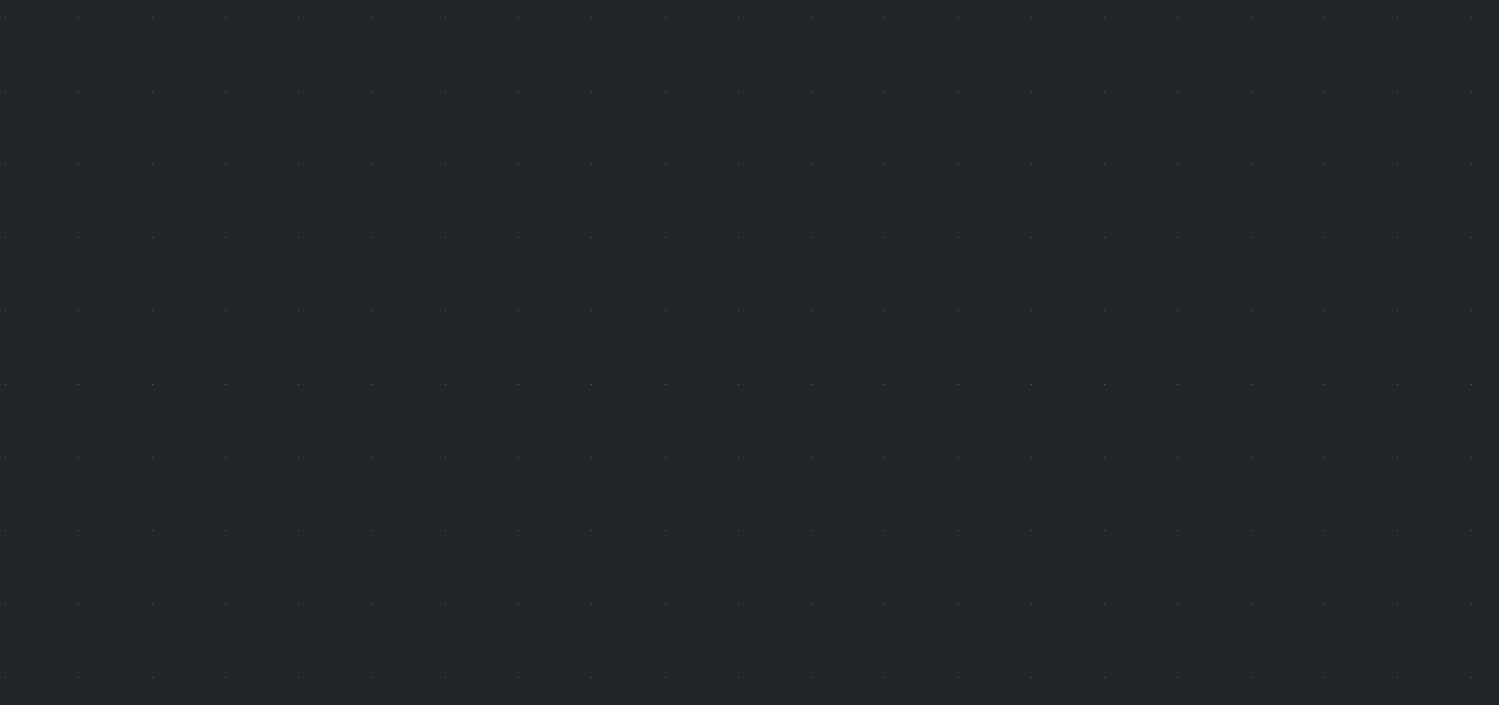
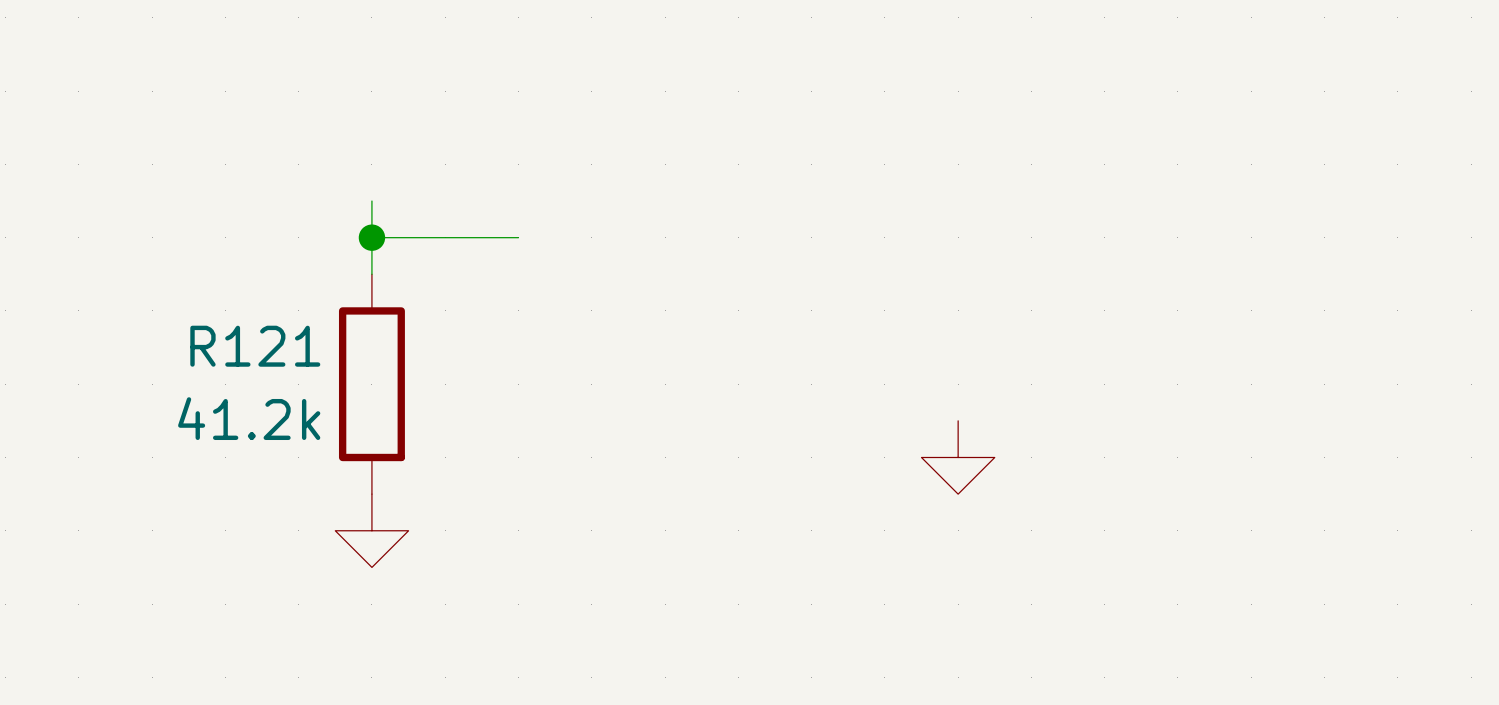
wire: none -> (371, 201) (371, 274)
wire: none -> (371, 237) (518, 237)
junction: none -> (371, 237)
R121: none -> 41.2k (371, 384)
power symbol: none -> (958, 457)
power symbol: none -> (371, 530)

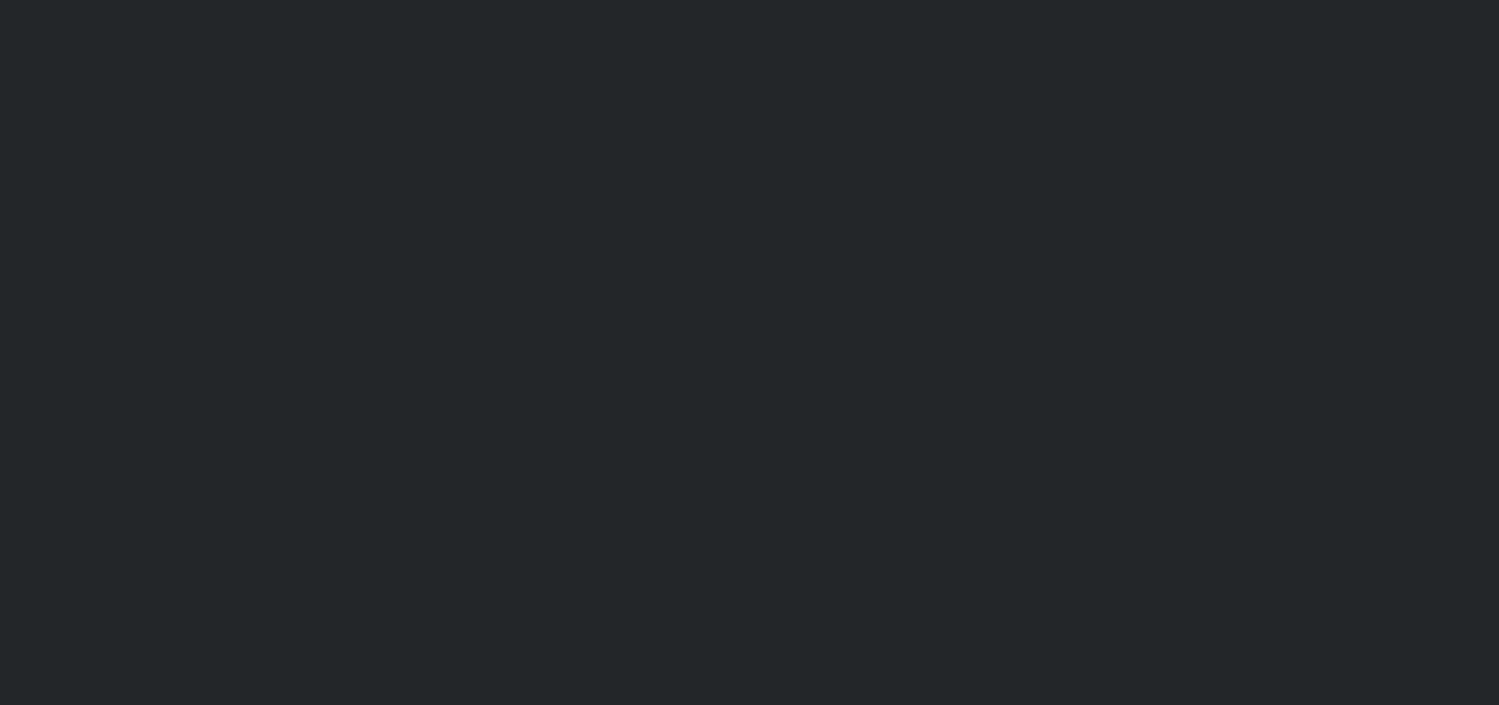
wire: (371, 201) (371, 274) -> none
wire: (371, 237) (518, 237) -> none
junction: (371, 237) -> none
R121: 41.2k (371, 384) -> none
power symbol: (958, 457) -> none
power symbol: (371, 530) -> none

